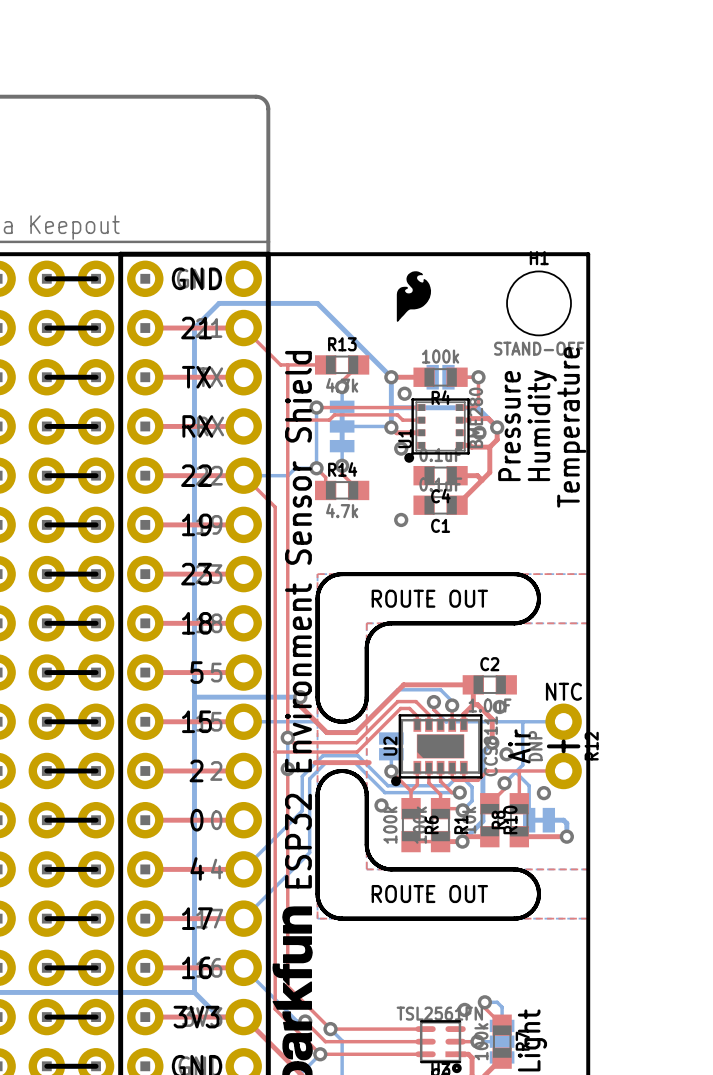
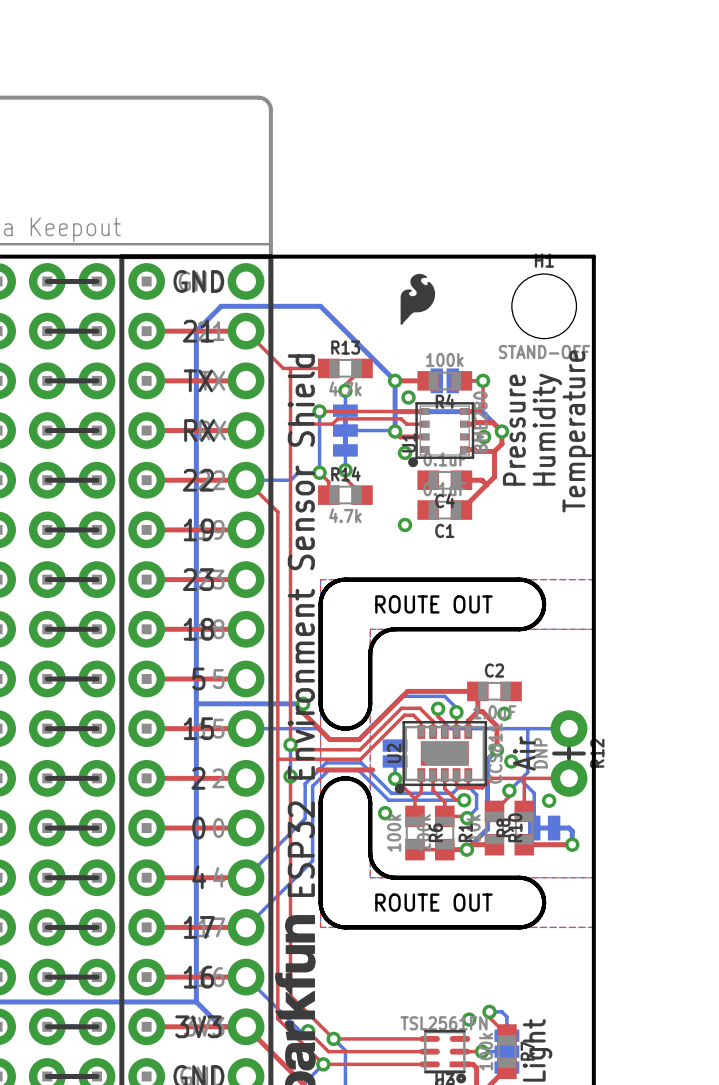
text: NTC (563, 691) -> none

